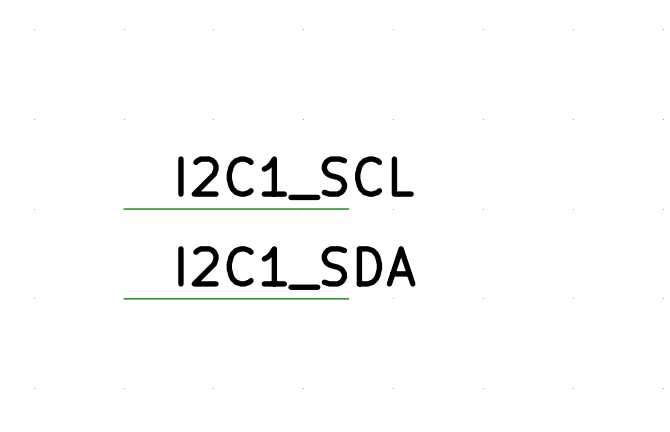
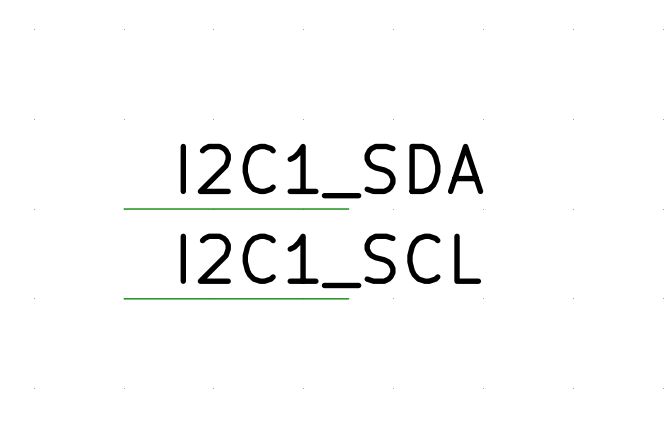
label: I2C1_SCL (296, 178) -> I2C1_SDA (331, 171)
label: I2C1_SDA (296, 268) -> I2C1_SCL (330, 260)

